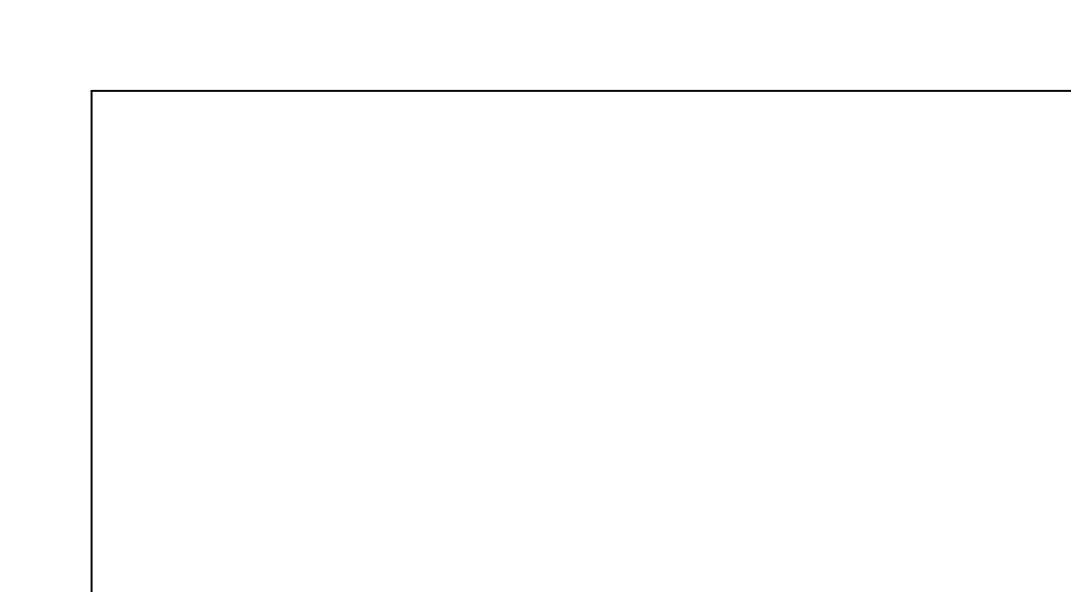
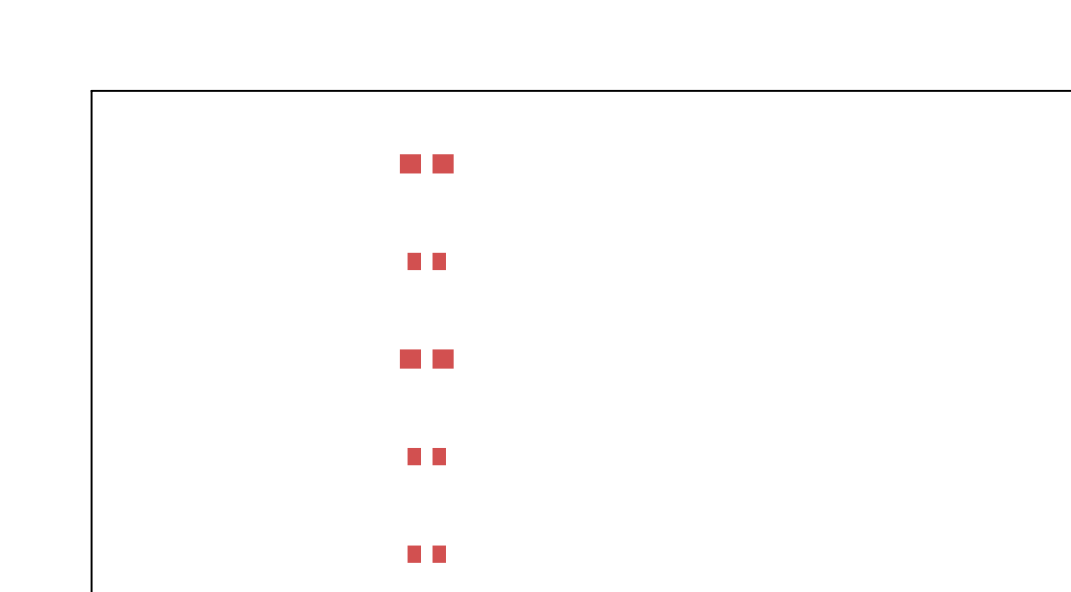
part: none -> (426, 163)
part: none -> (426, 261)
part: none -> (426, 359)
part: none -> (426, 456)
part: none -> (426, 554)

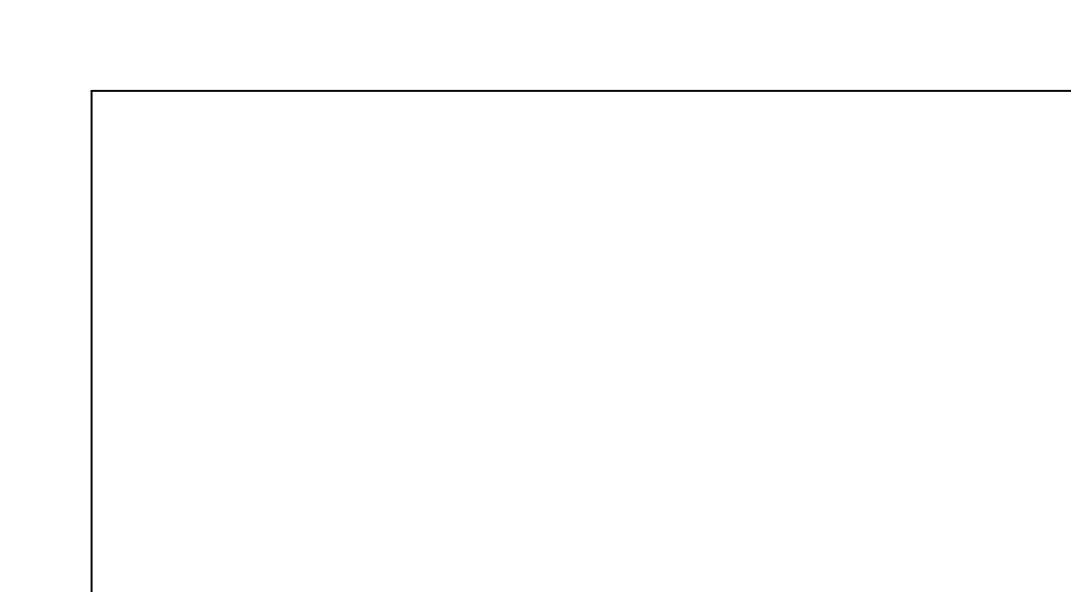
part: (426, 163) -> none
part: (426, 261) -> none
part: (426, 359) -> none
part: (426, 456) -> none
part: (426, 554) -> none

